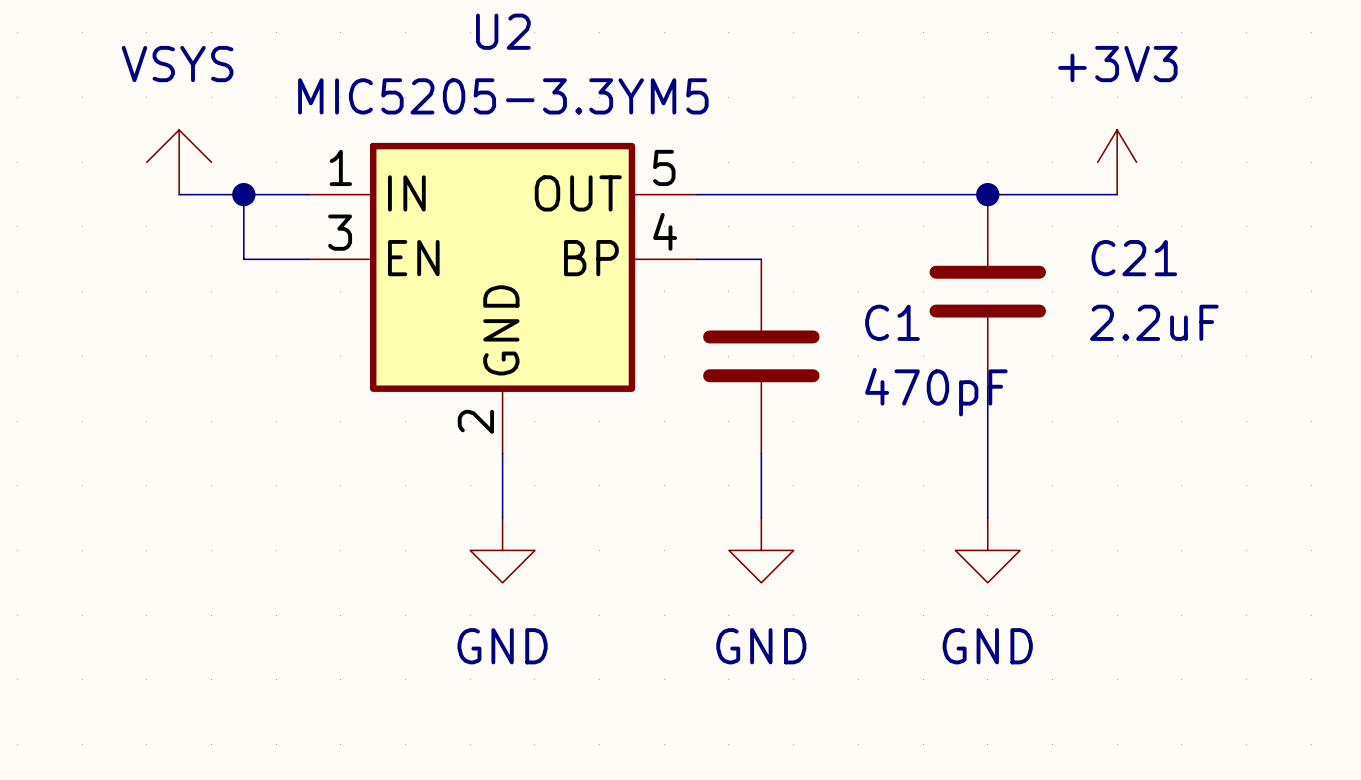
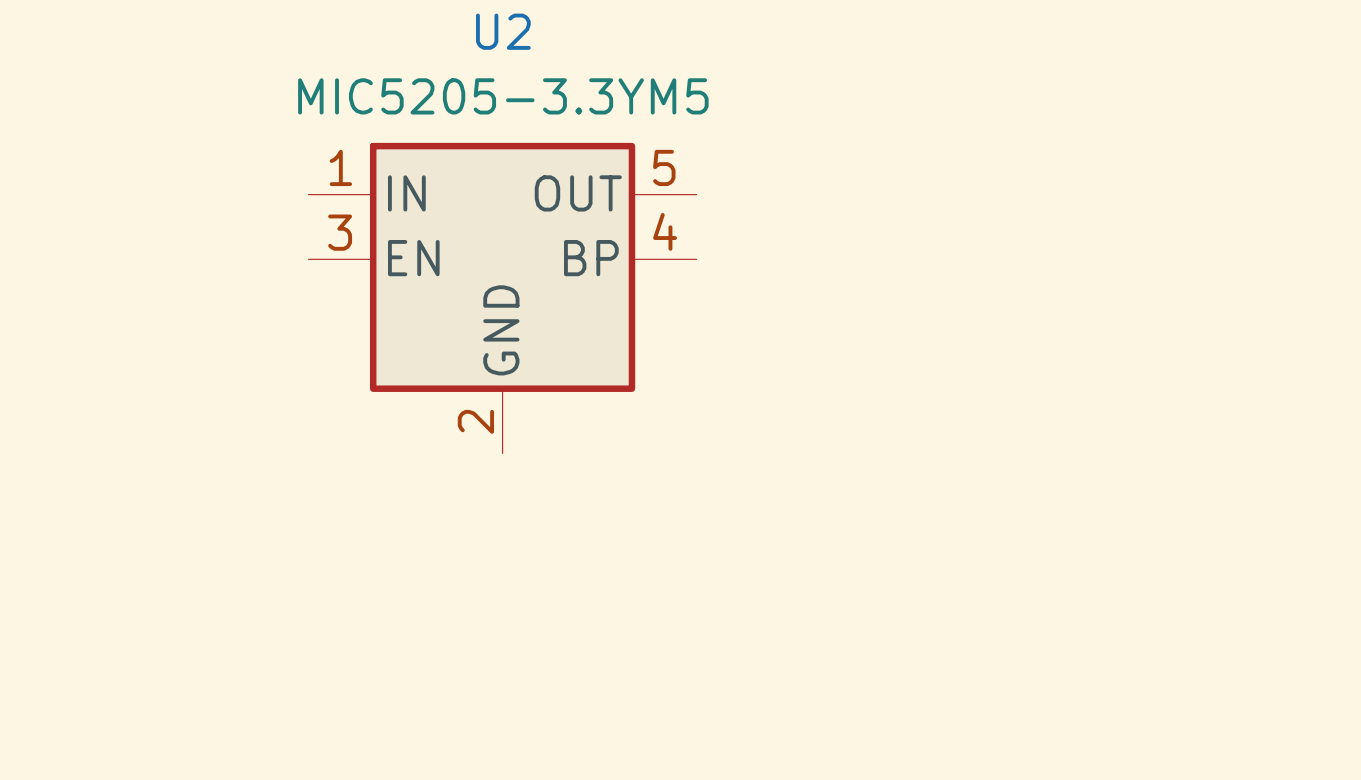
power symbol: VSYS (179, 162) -> none
power symbol: +3V3 (1117, 162) -> none
wire: (179, 194) (308, 194) -> none
wire: (243, 194) (243, 259) (308, 259) -> none
junction: (243, 194) -> none
wire: (696, 194) (1117, 194) -> none
junction: (987, 194) -> none
wire: (696, 259) (761, 259) -> none
C21: 2.2uF (987, 291) -> none
C1: 470pF (761, 356) -> none
wire: (987, 388) (987, 518) -> none
wire: (502, 453) (502, 518) -> none
wire: (761, 453) (761, 518) -> none
power symbol: GND (502, 550) -> none
power symbol: GND (761, 550) -> none
power symbol: GND (987, 550) -> none

